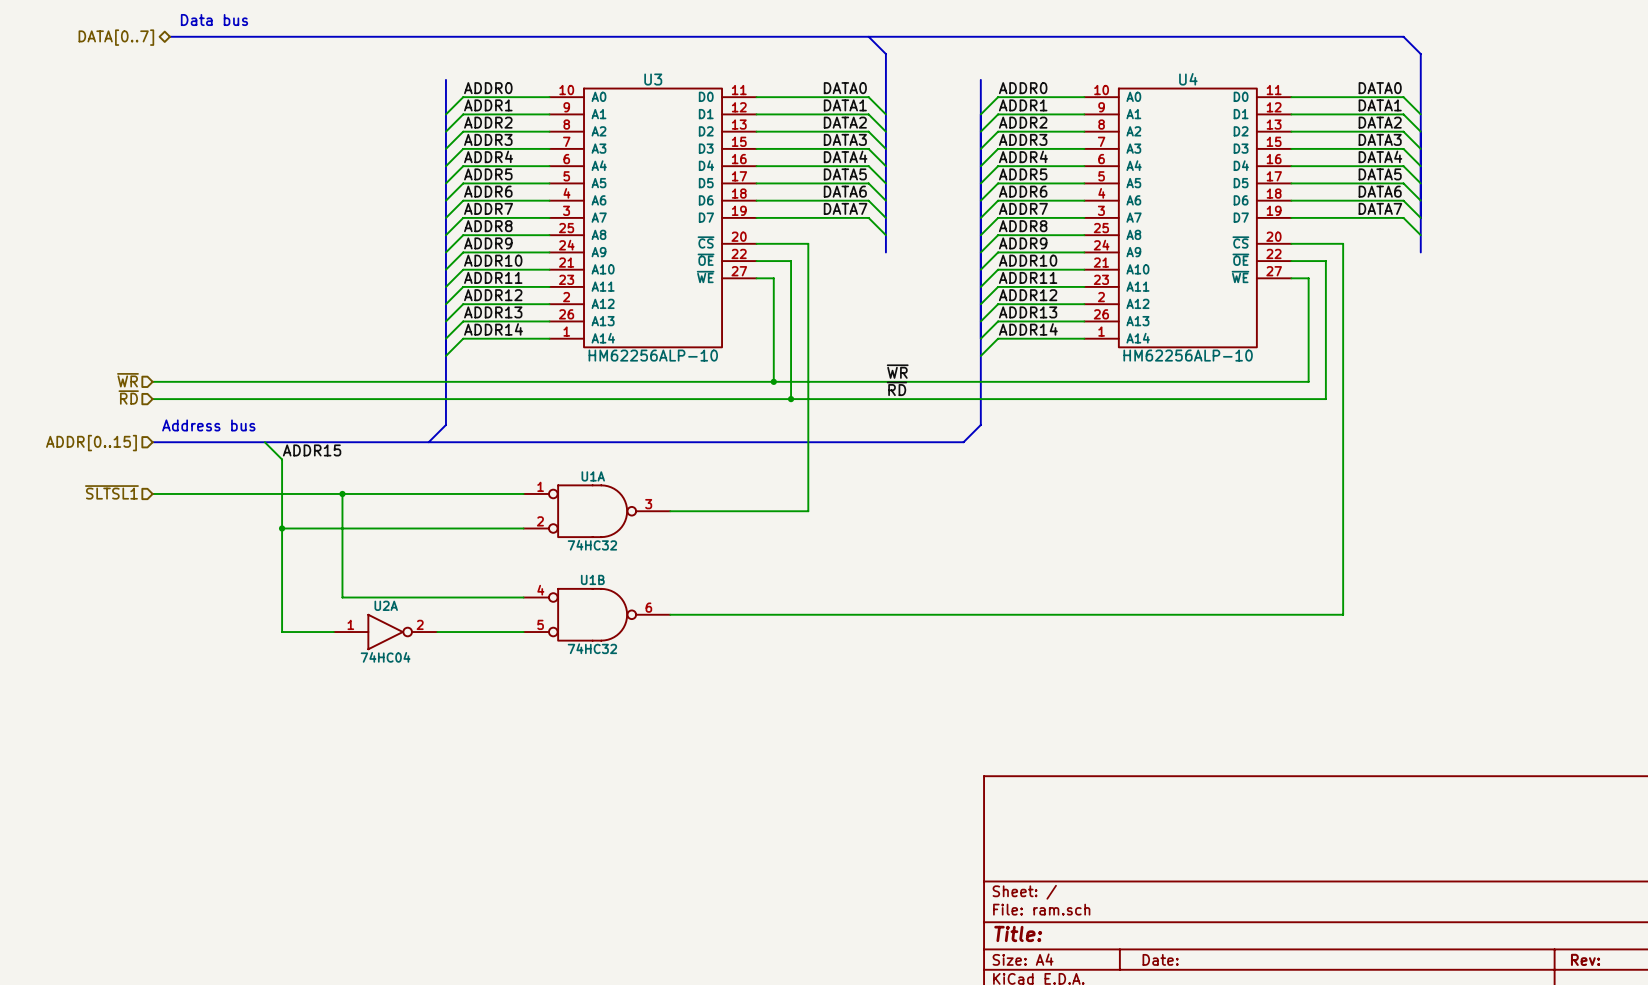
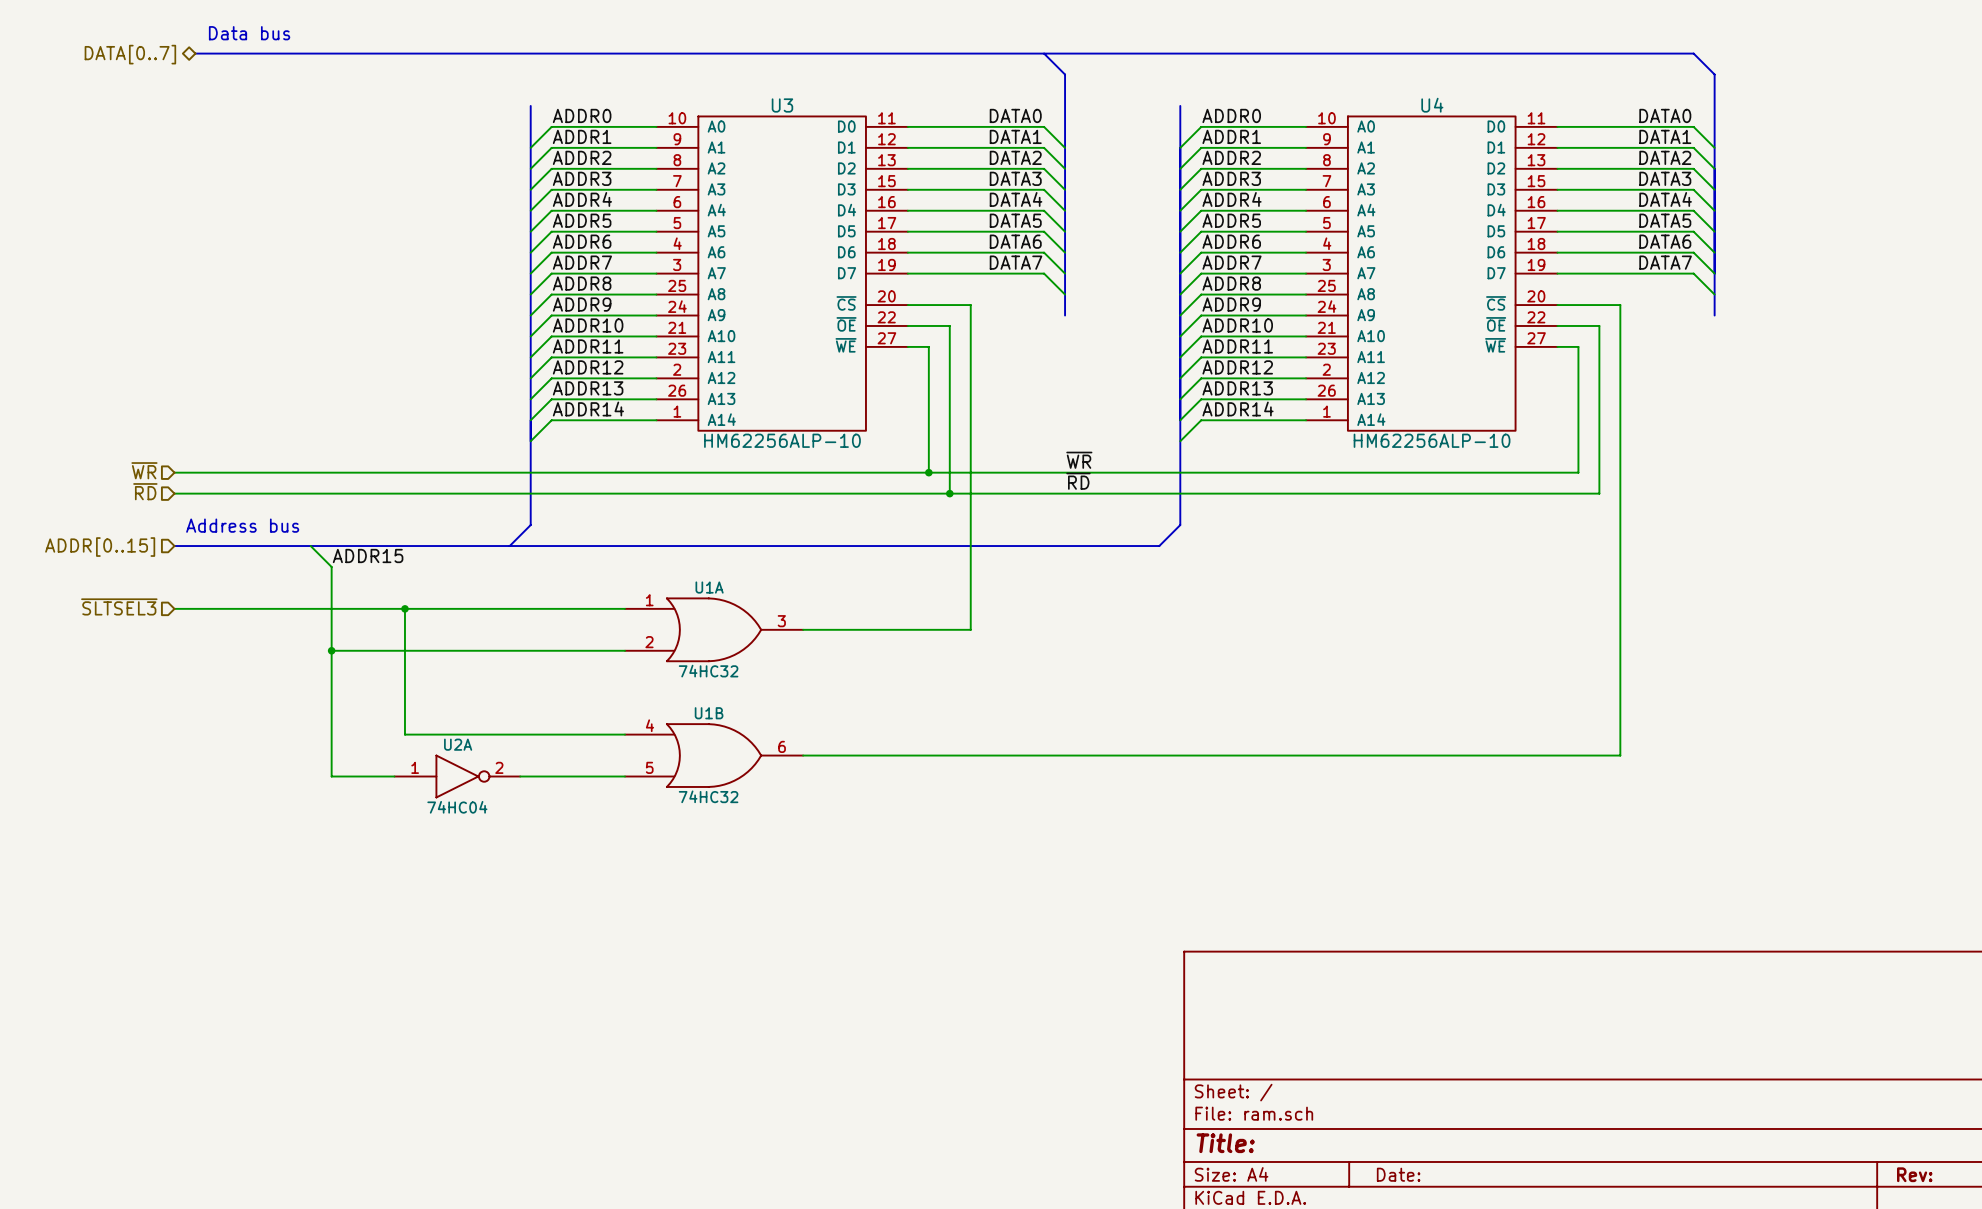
U1A symbol: [523, 485, 671, 538] -> [625, 598, 804, 662]
hierarchical label: ~{SLTSL1} (111, 492) -> ~{SLTSEL3} (119, 606)
U1B symbol: [523, 588, 671, 641] -> [625, 724, 804, 787]

